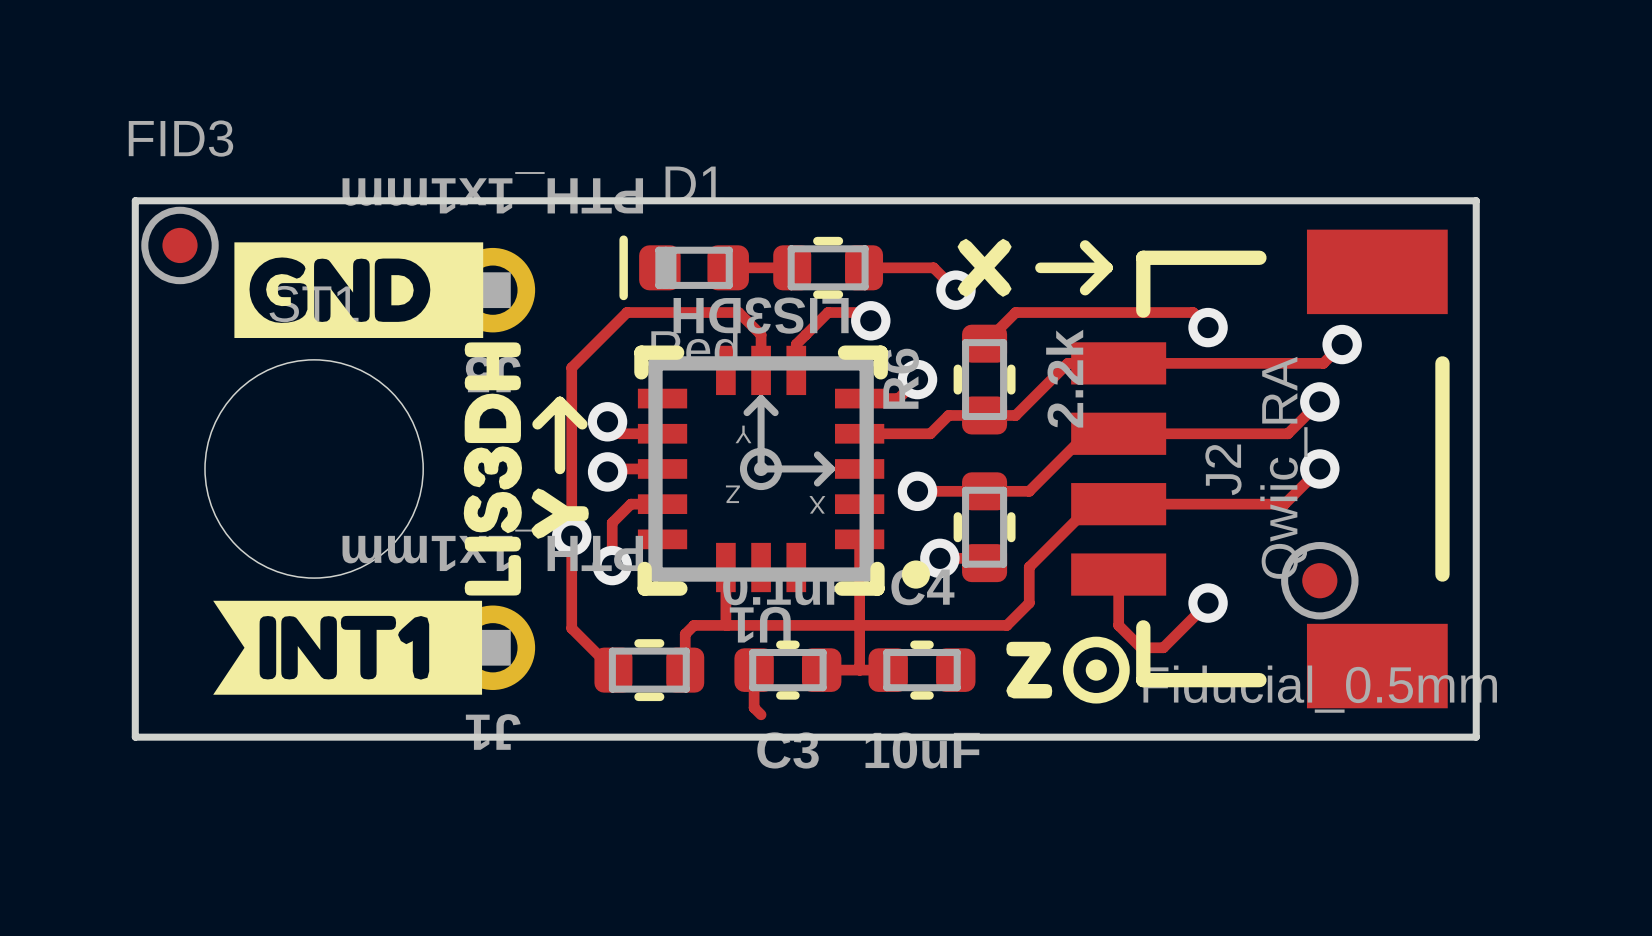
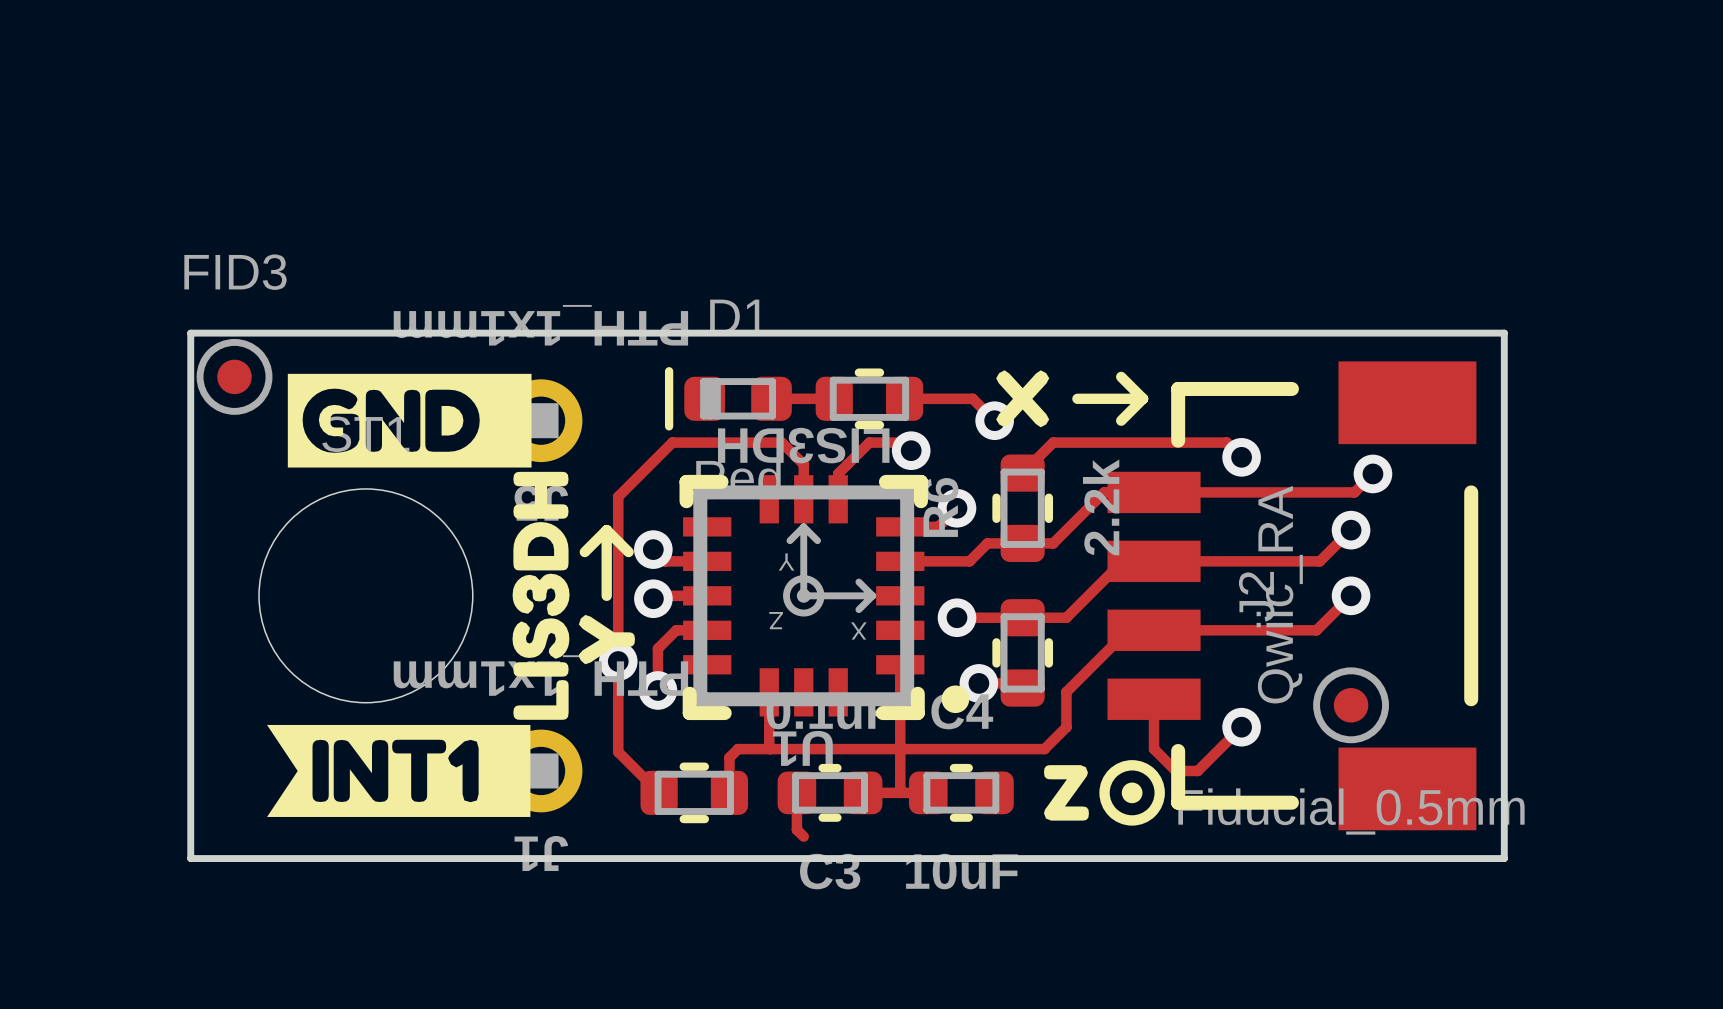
J2 value position: Qwiic_RA (1283, 467) -> Qwiic_RA (1279, 594)

